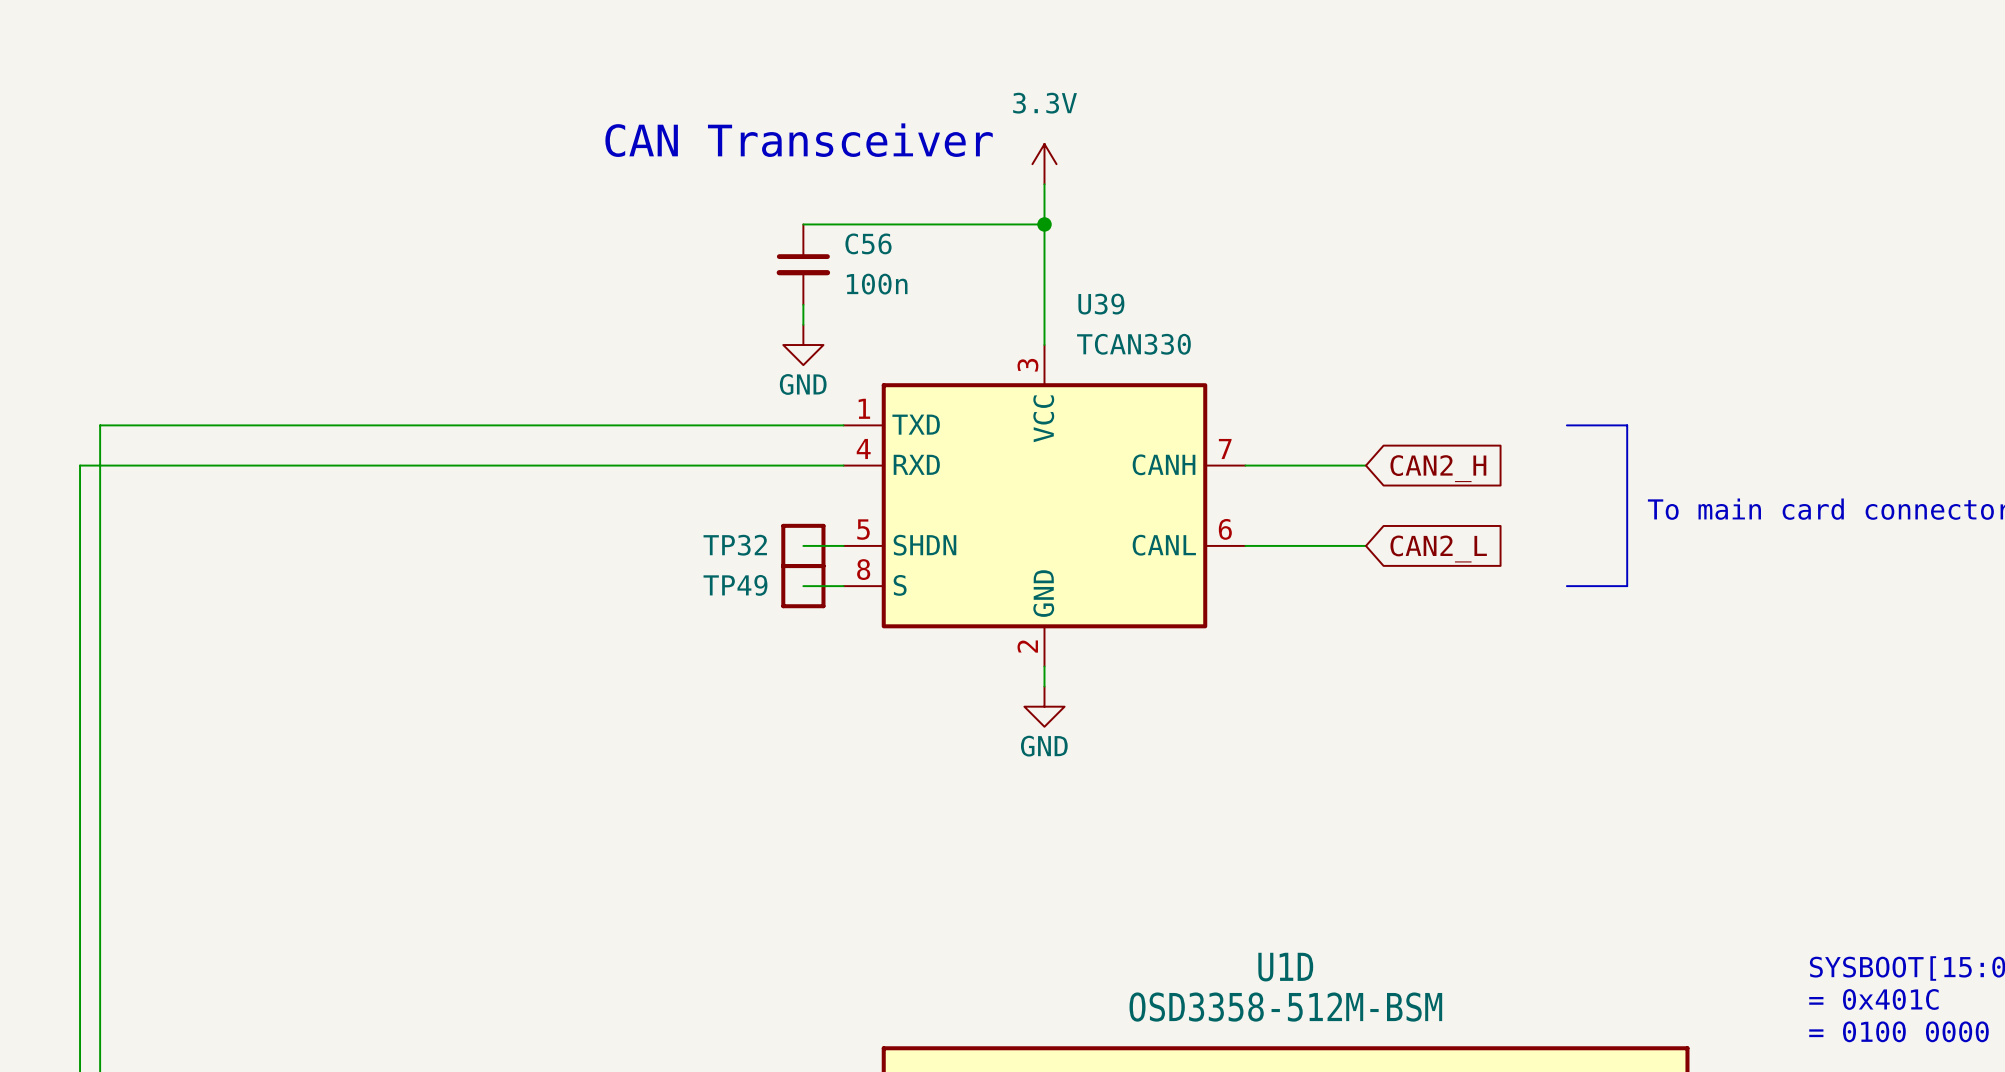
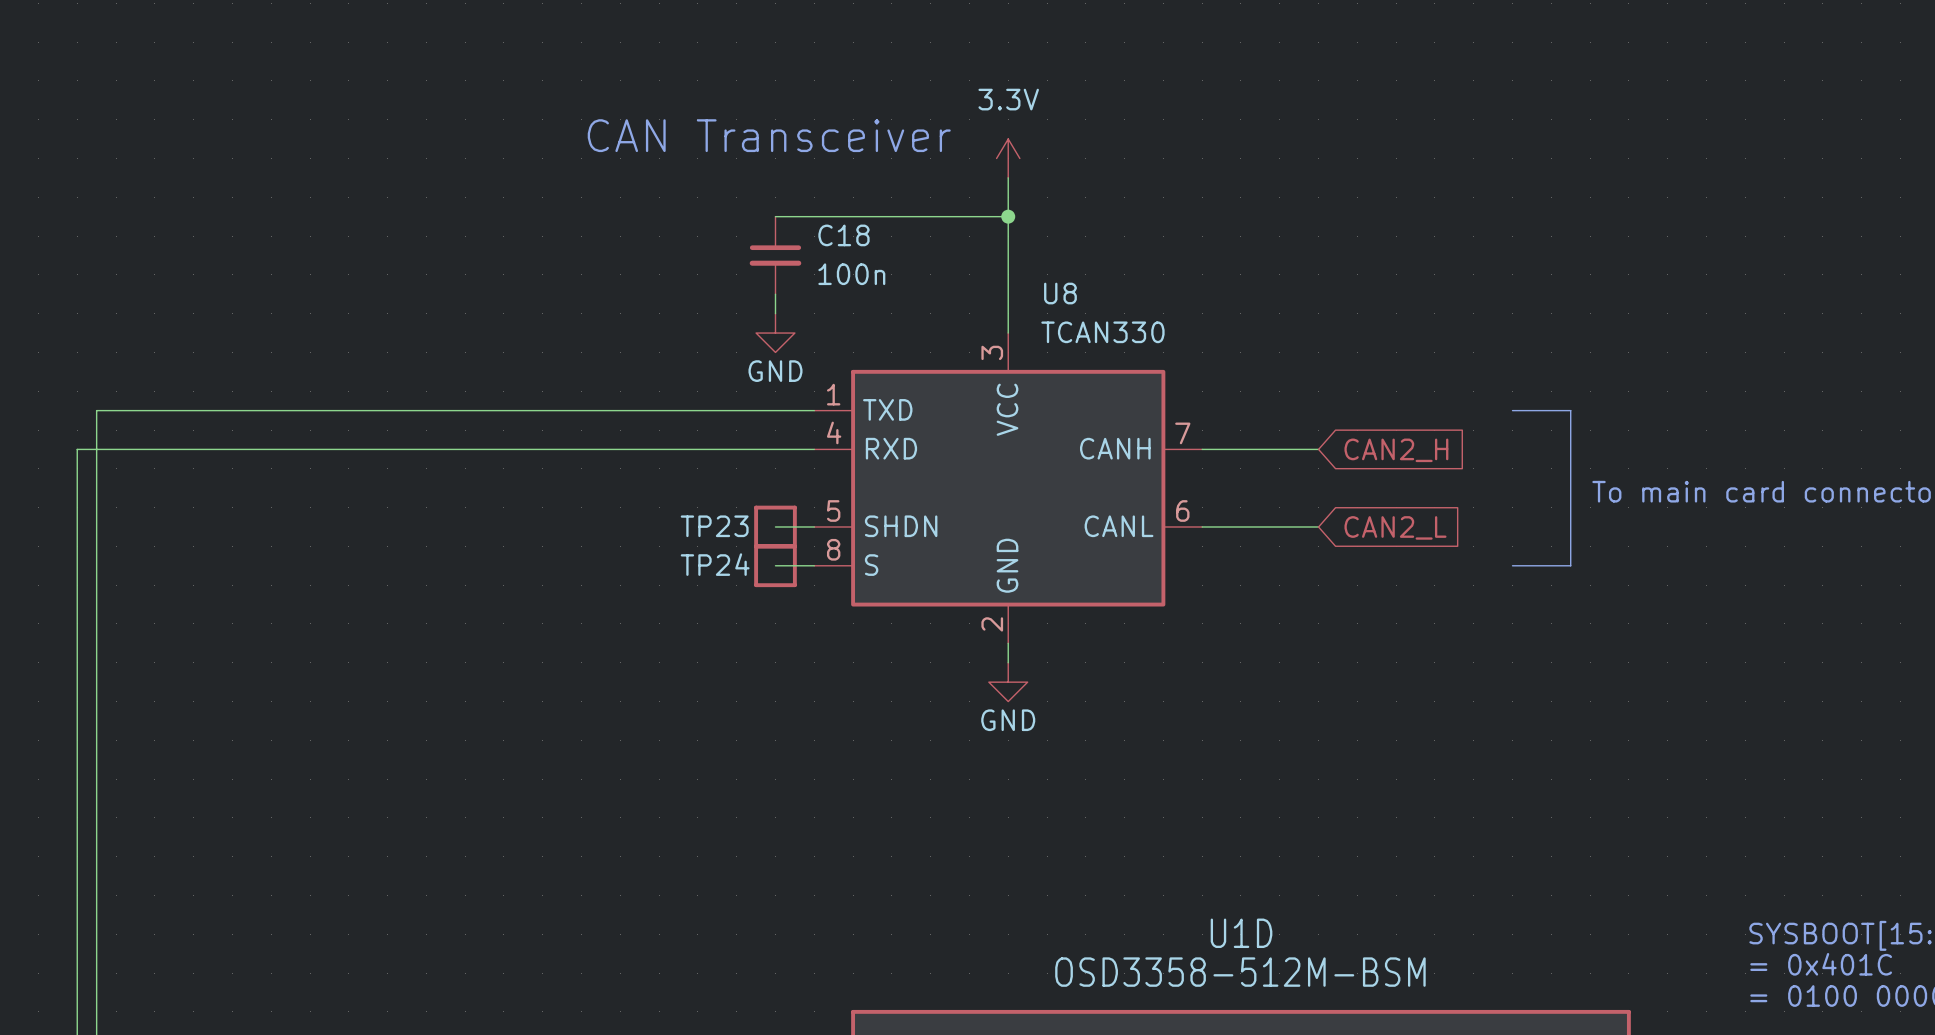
C56 name: C56 (868, 243) -> C18 (843, 235)
U39 name: U39 (1101, 304) -> U8 (1060, 293)
TP32 name: TP32 (735, 545) -> TP23 (714, 526)
TP49 name: TP49 (735, 585) -> TP24 (715, 564)

